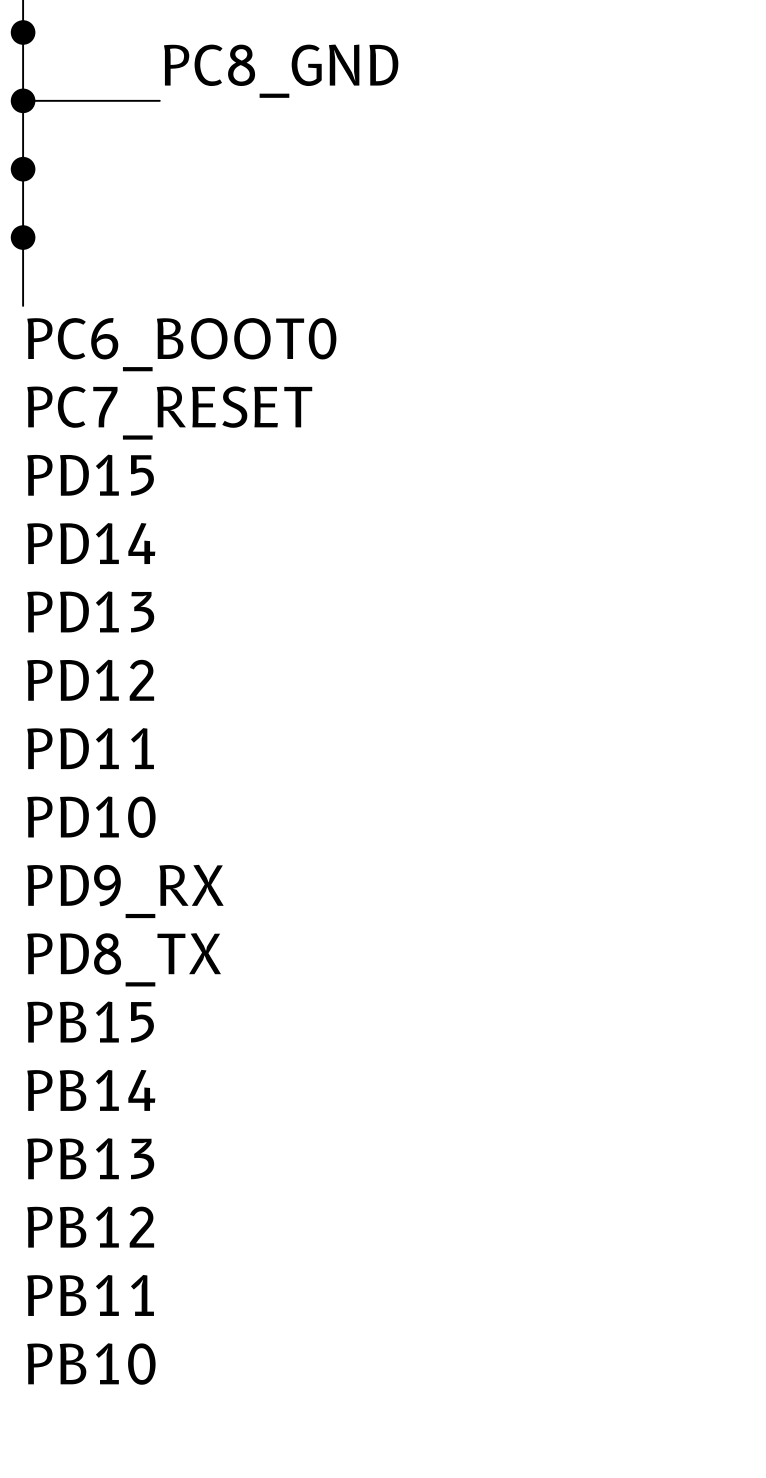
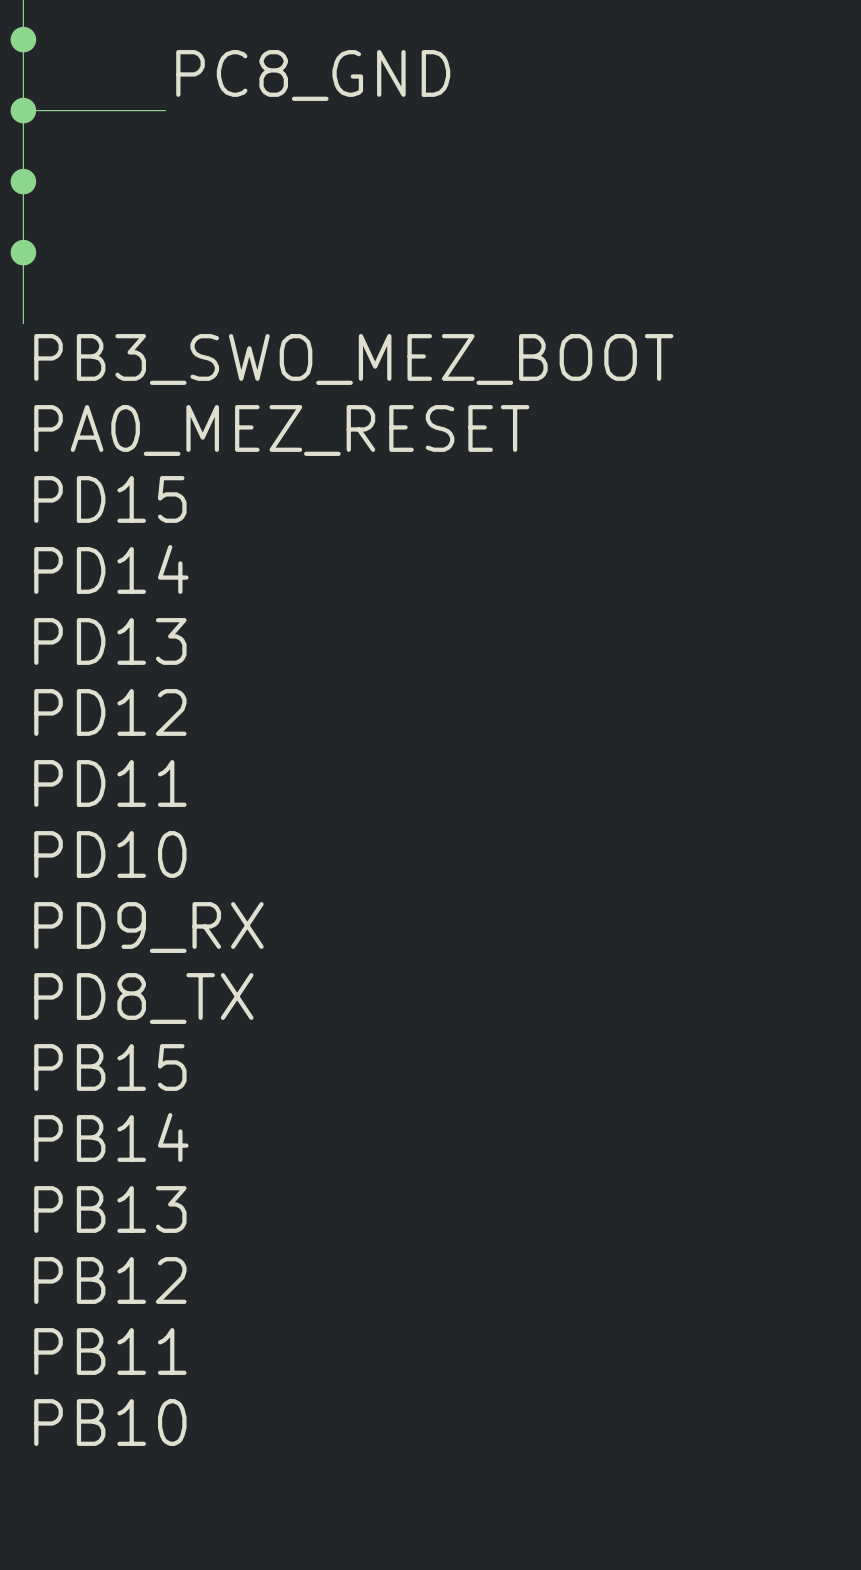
label: PC6_BOOT0 (181, 344) -> PB3_SWO_MEZ_BOOT (353, 359)
label: PC7_RESET (169, 413) -> PA0_MEZ_RESET (281, 430)

